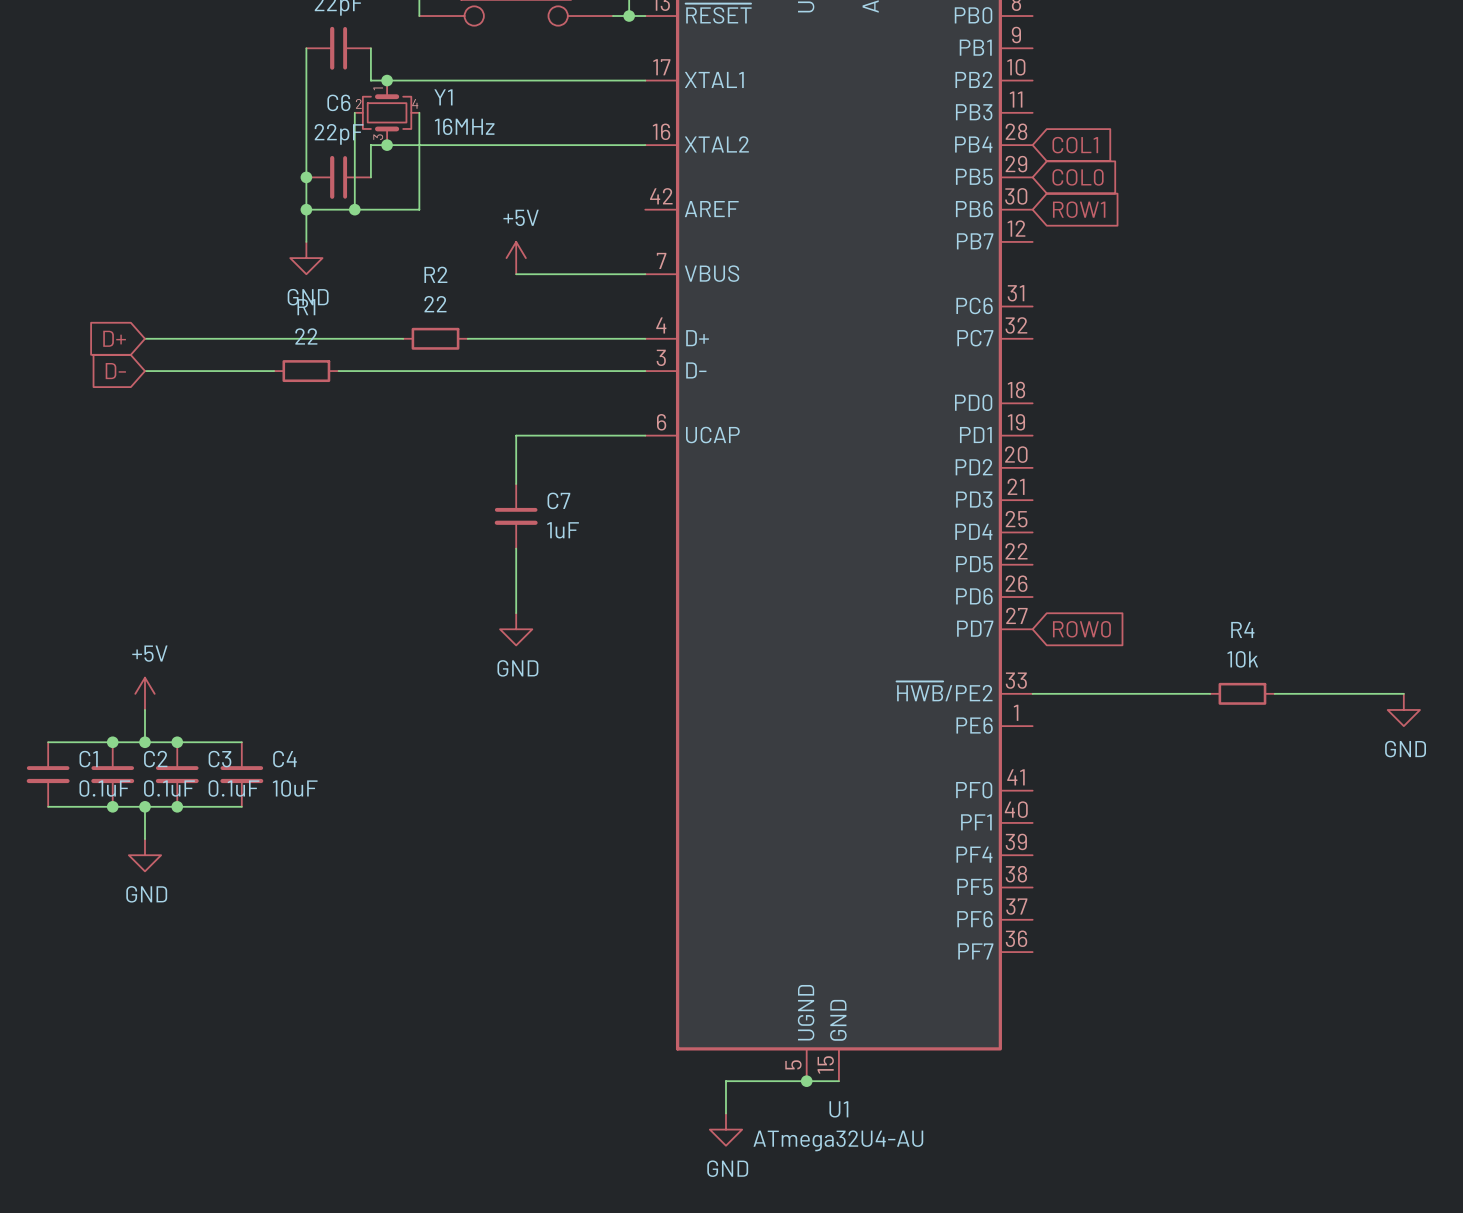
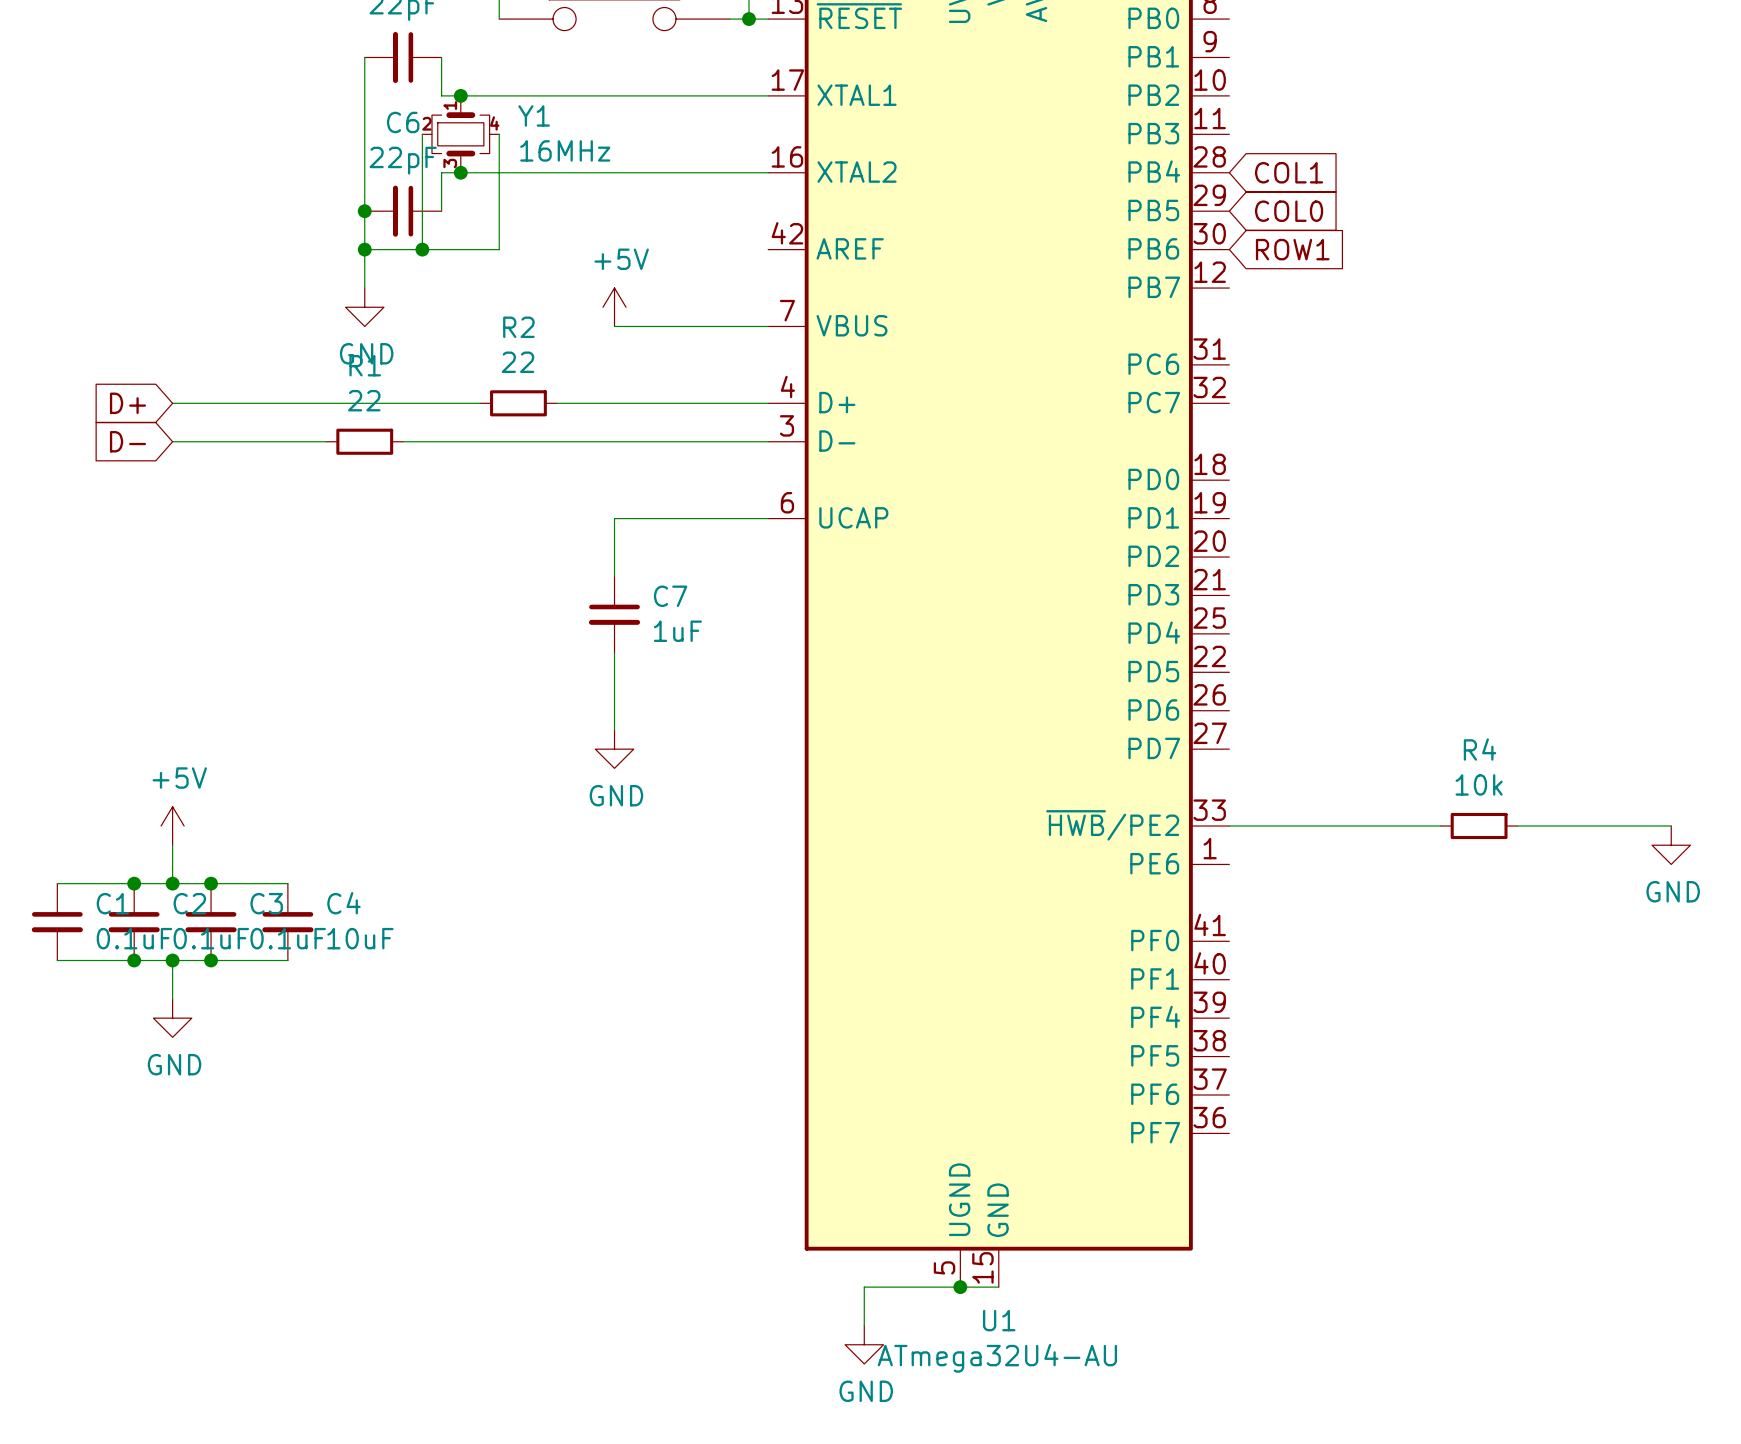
global label: ROW0 (1081, 629) -> none

